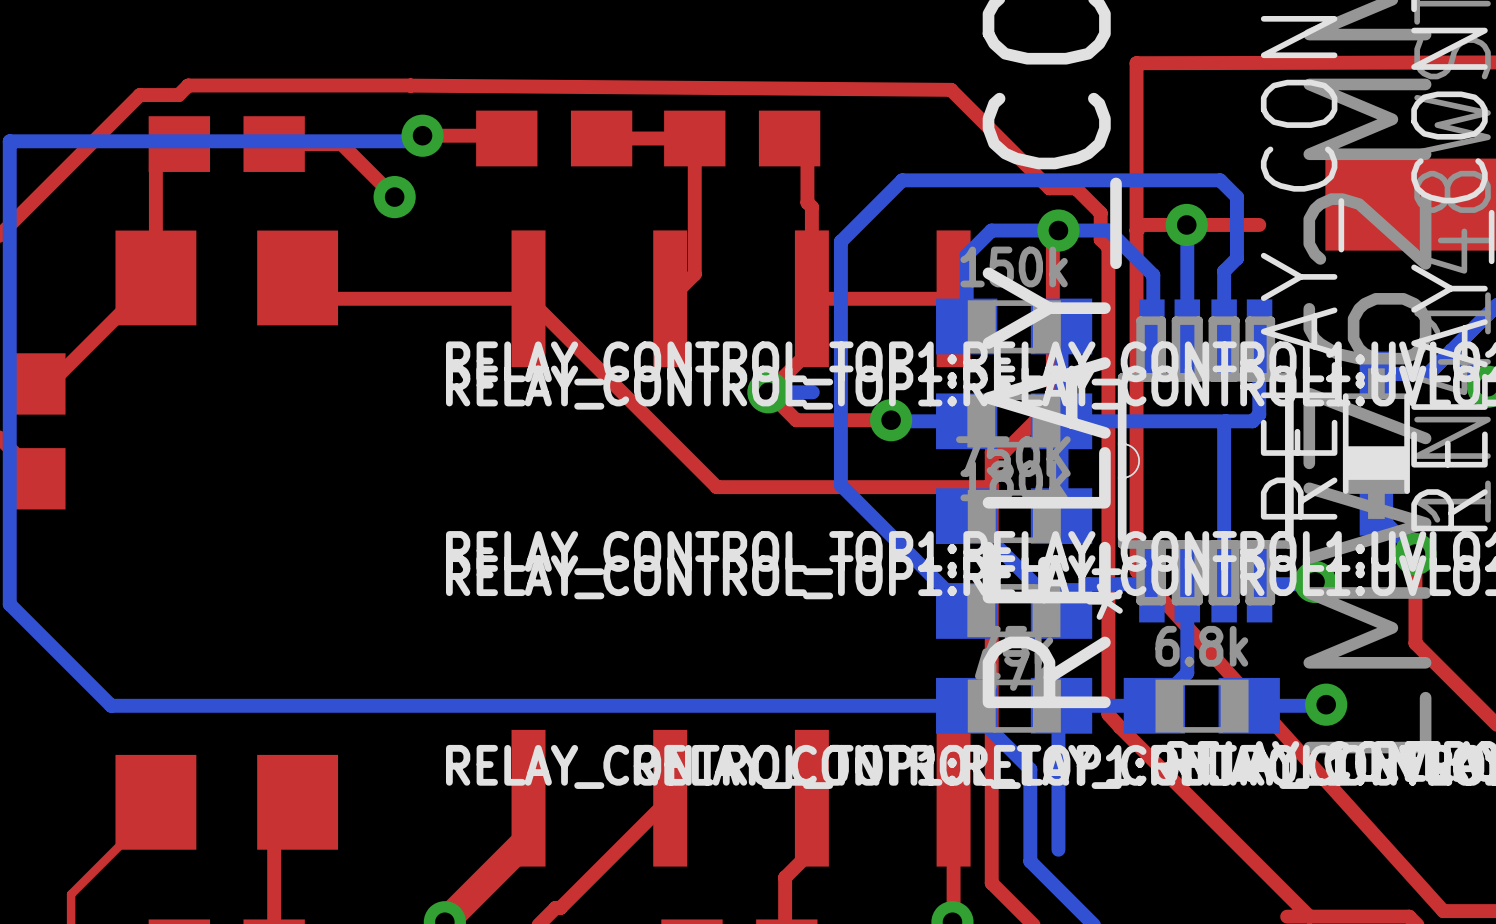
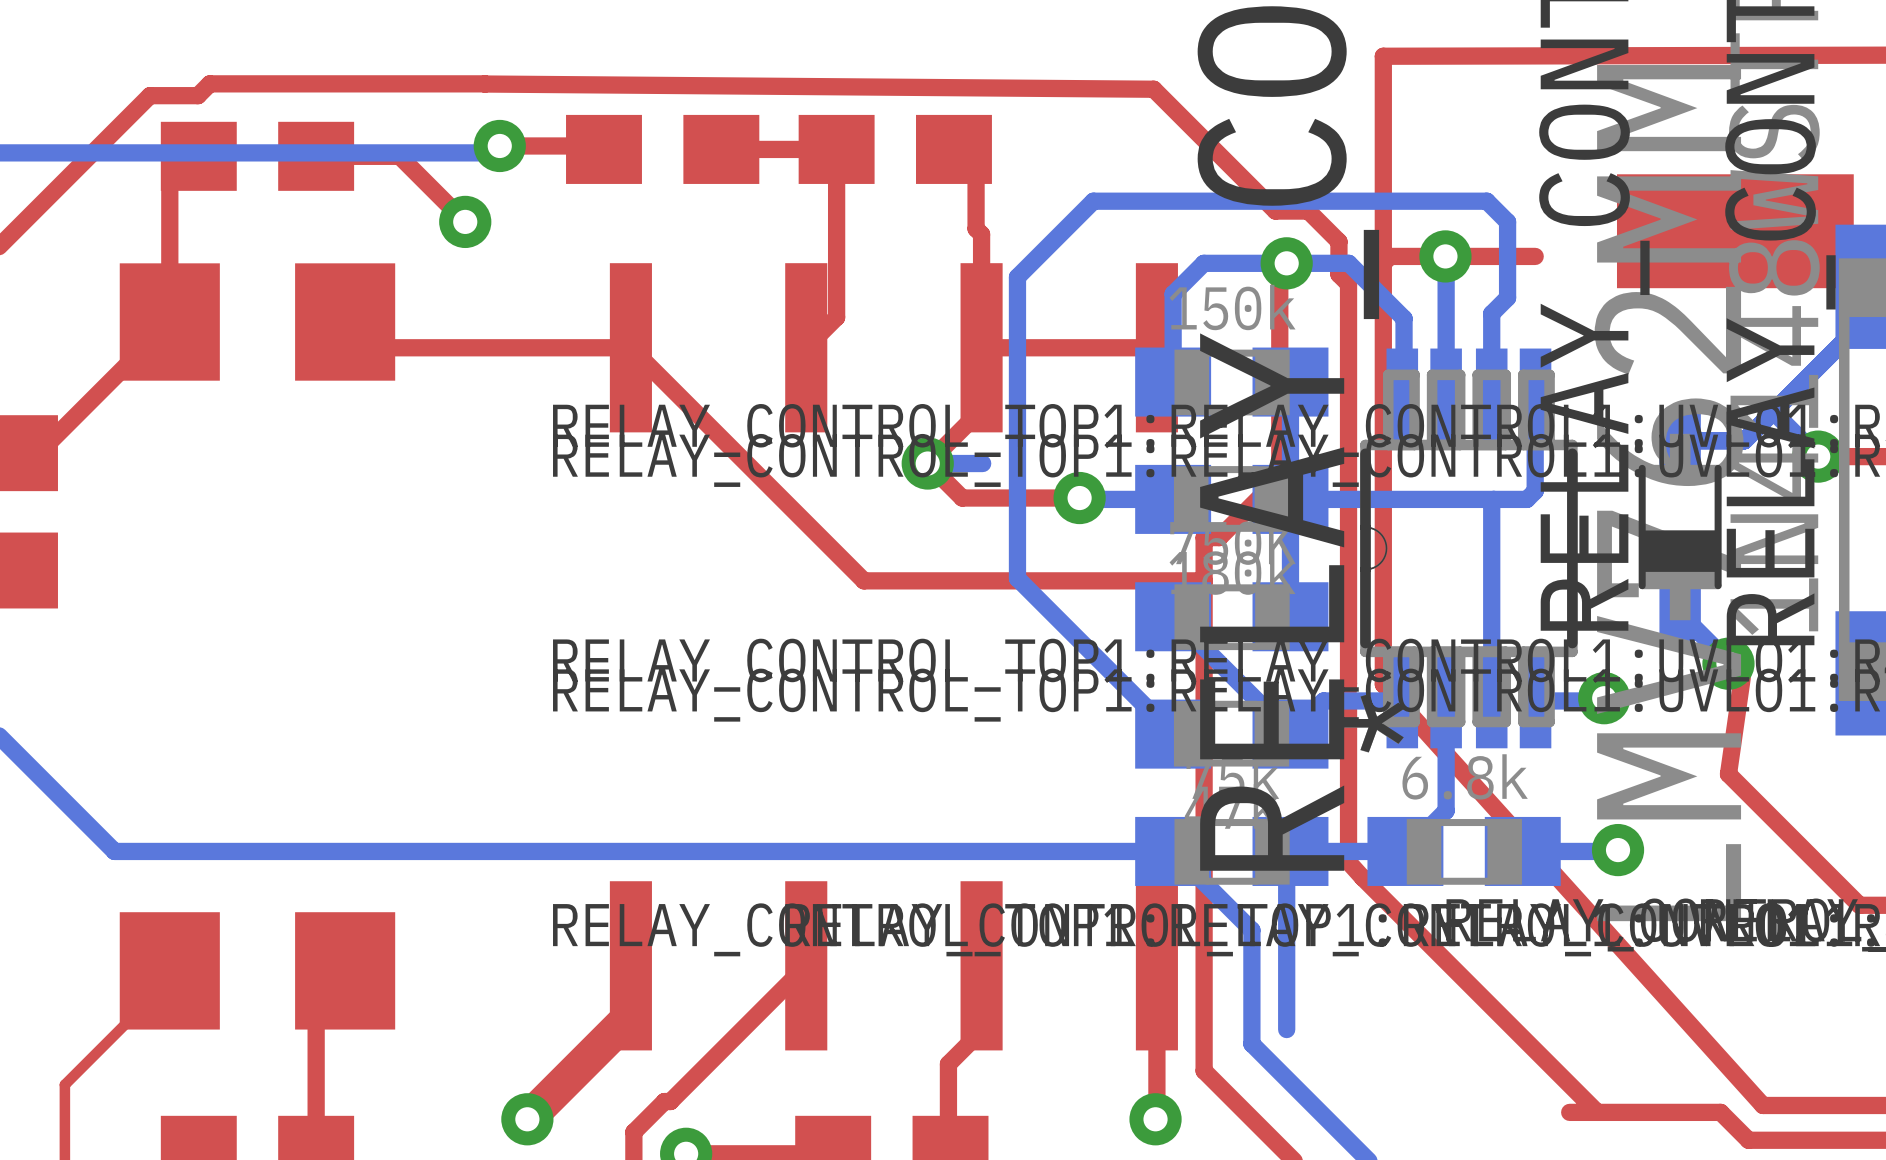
top track: (1415, 554) (1415, 643) -> (1742, 677) (1728, 774)

